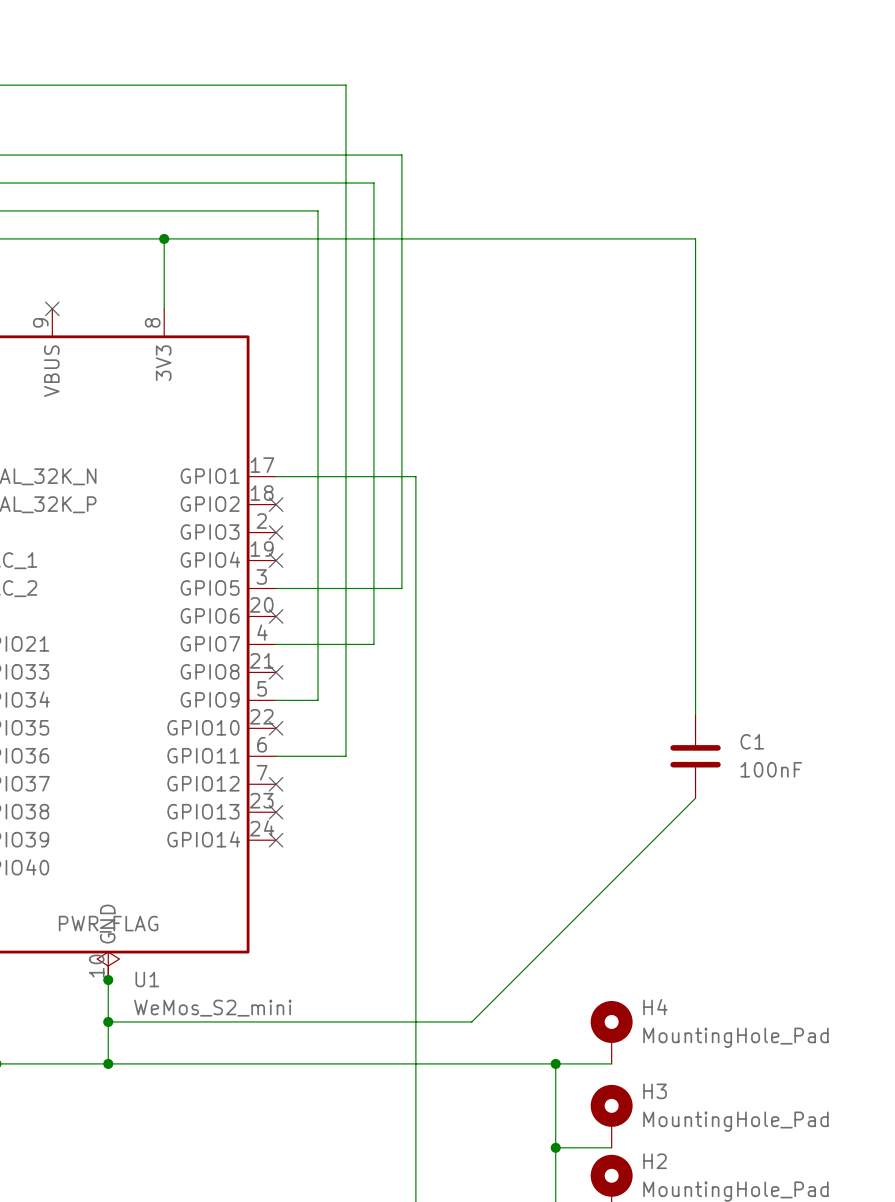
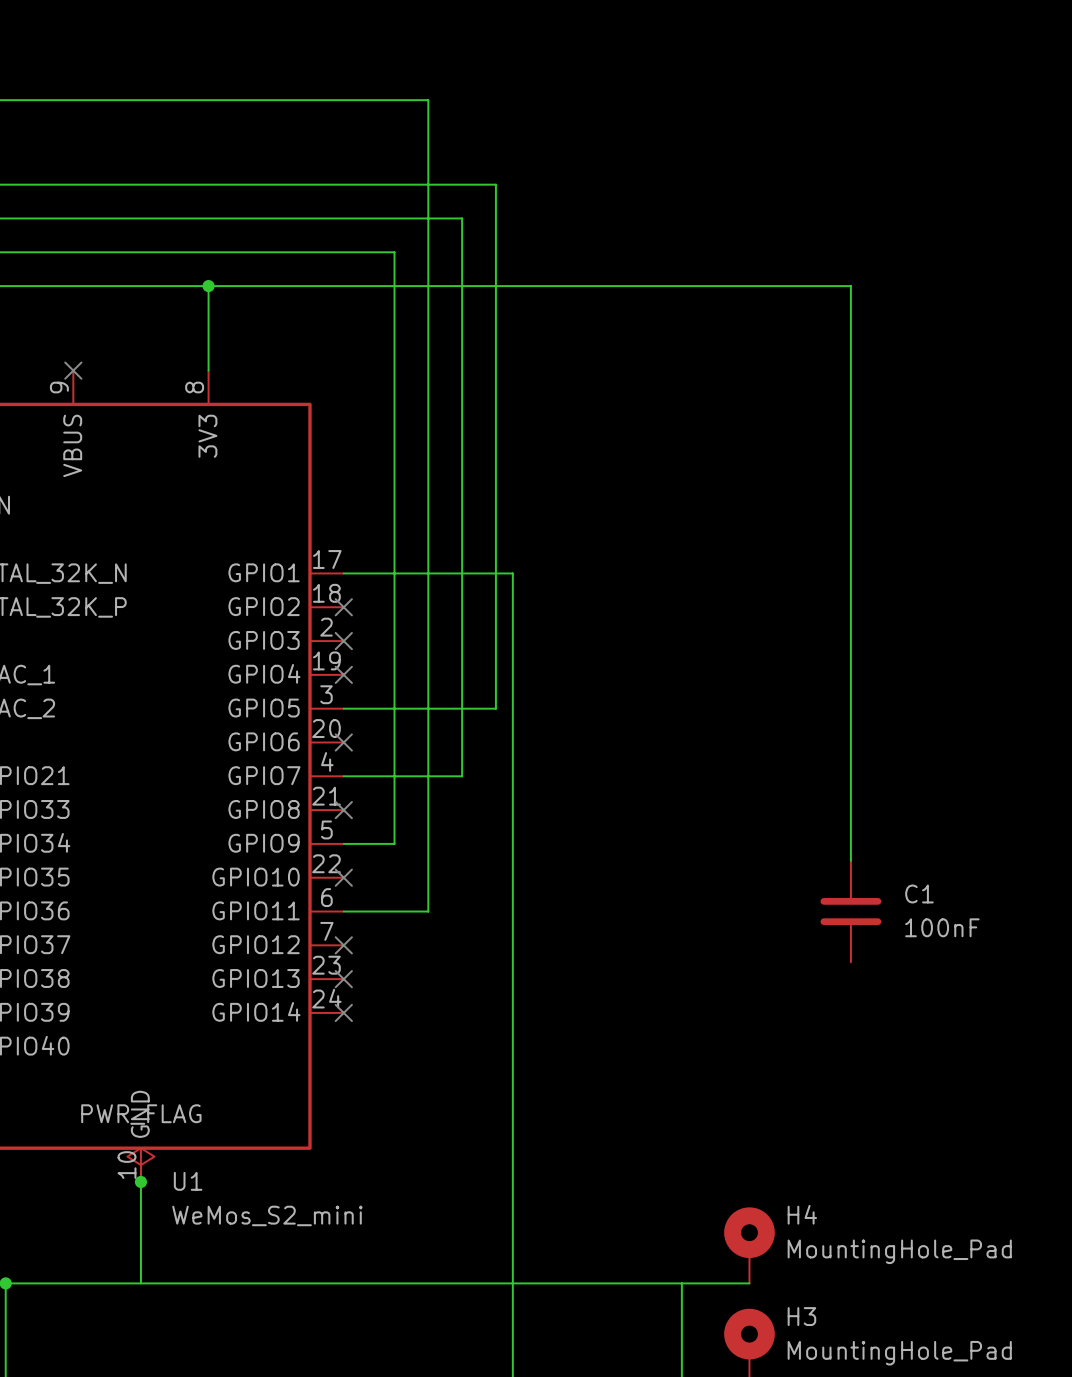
wire: (695, 798) (471, 1021) (108, 1021) -> none
junction: (108, 1021) -> none
junction: (108, 1063) -> none
junction: (555, 1063) -> none

